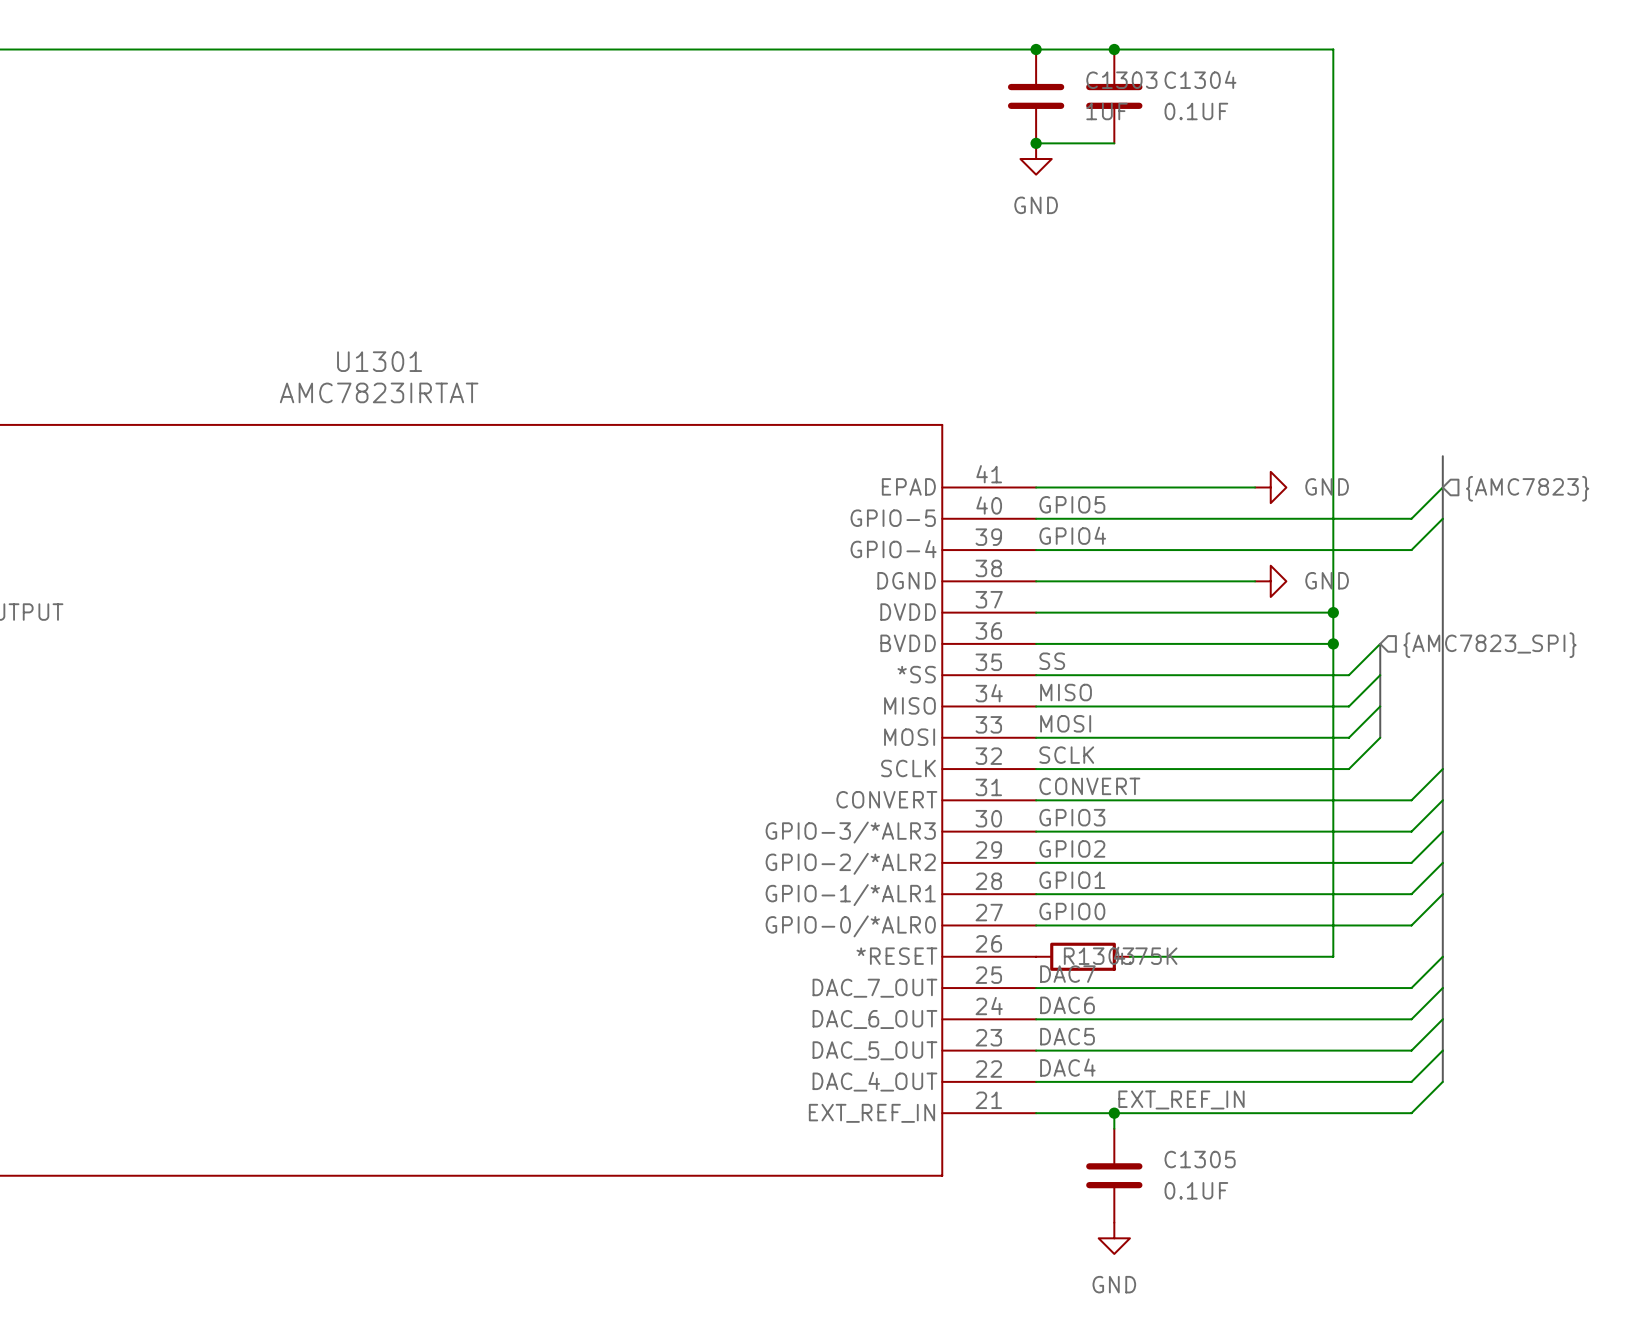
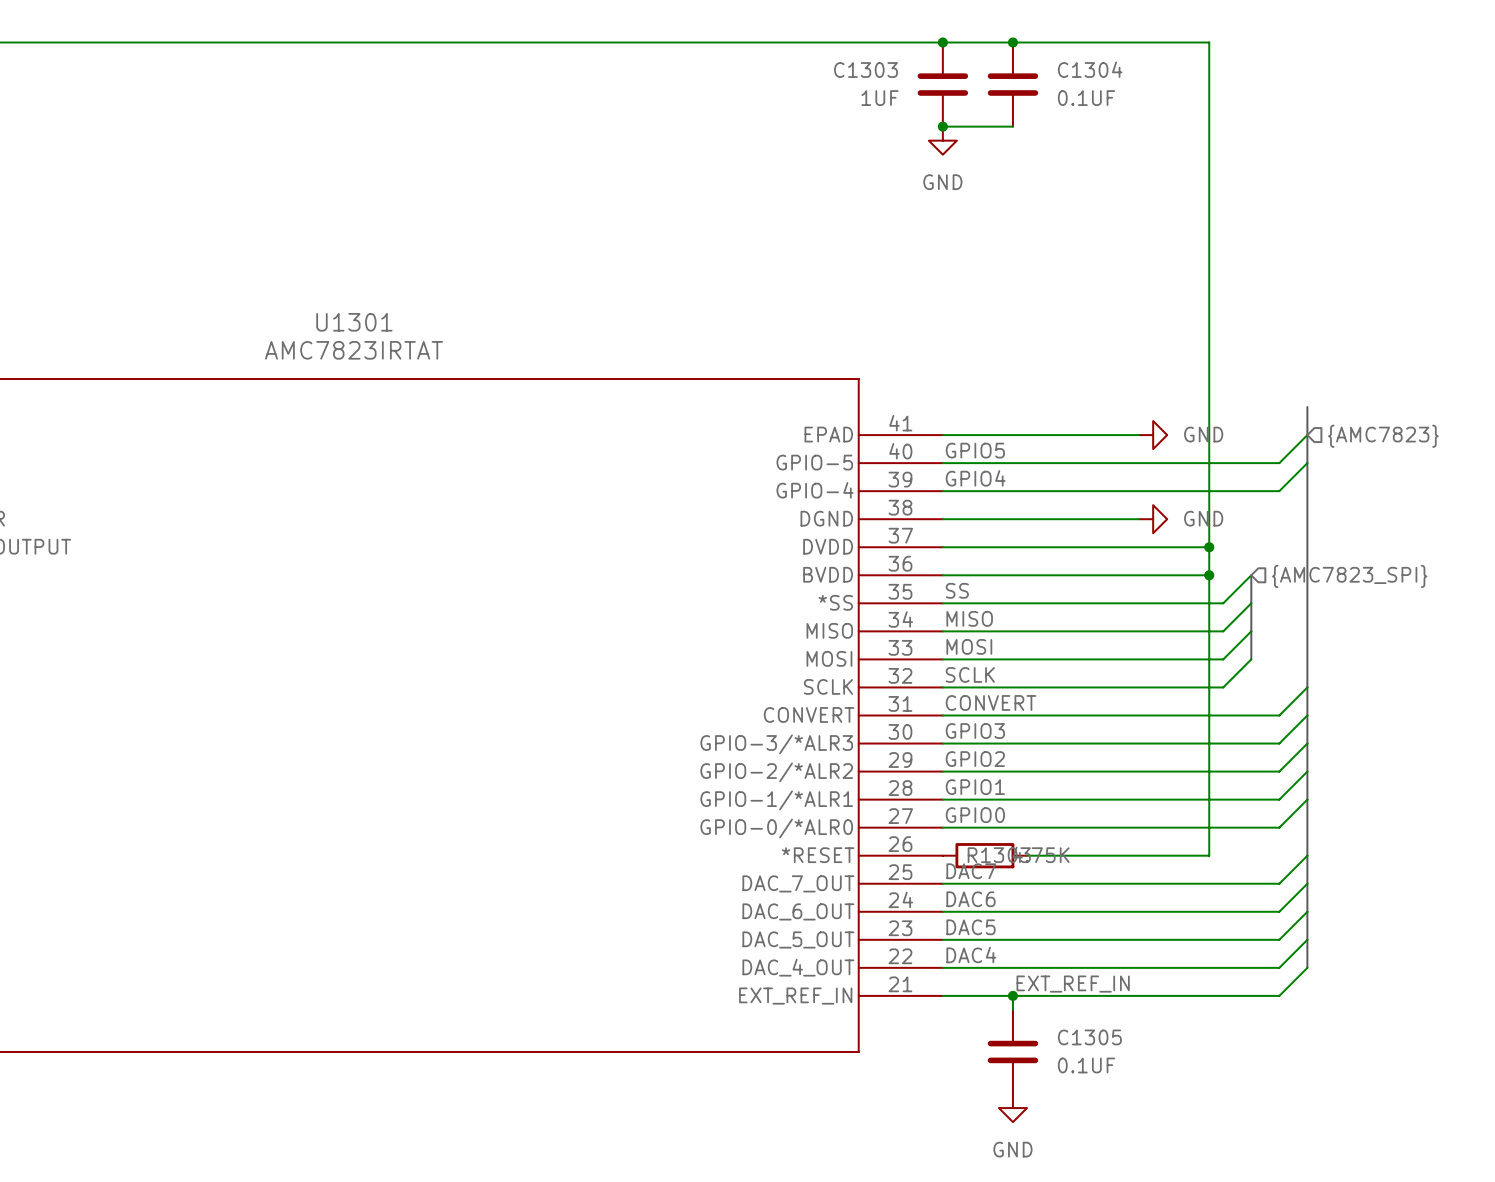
C1303 name position: C1303 (1121, 80) -> C1303 (865, 70)
C1303 value position: 1UF (1106, 111) -> 1UF (879, 98)

